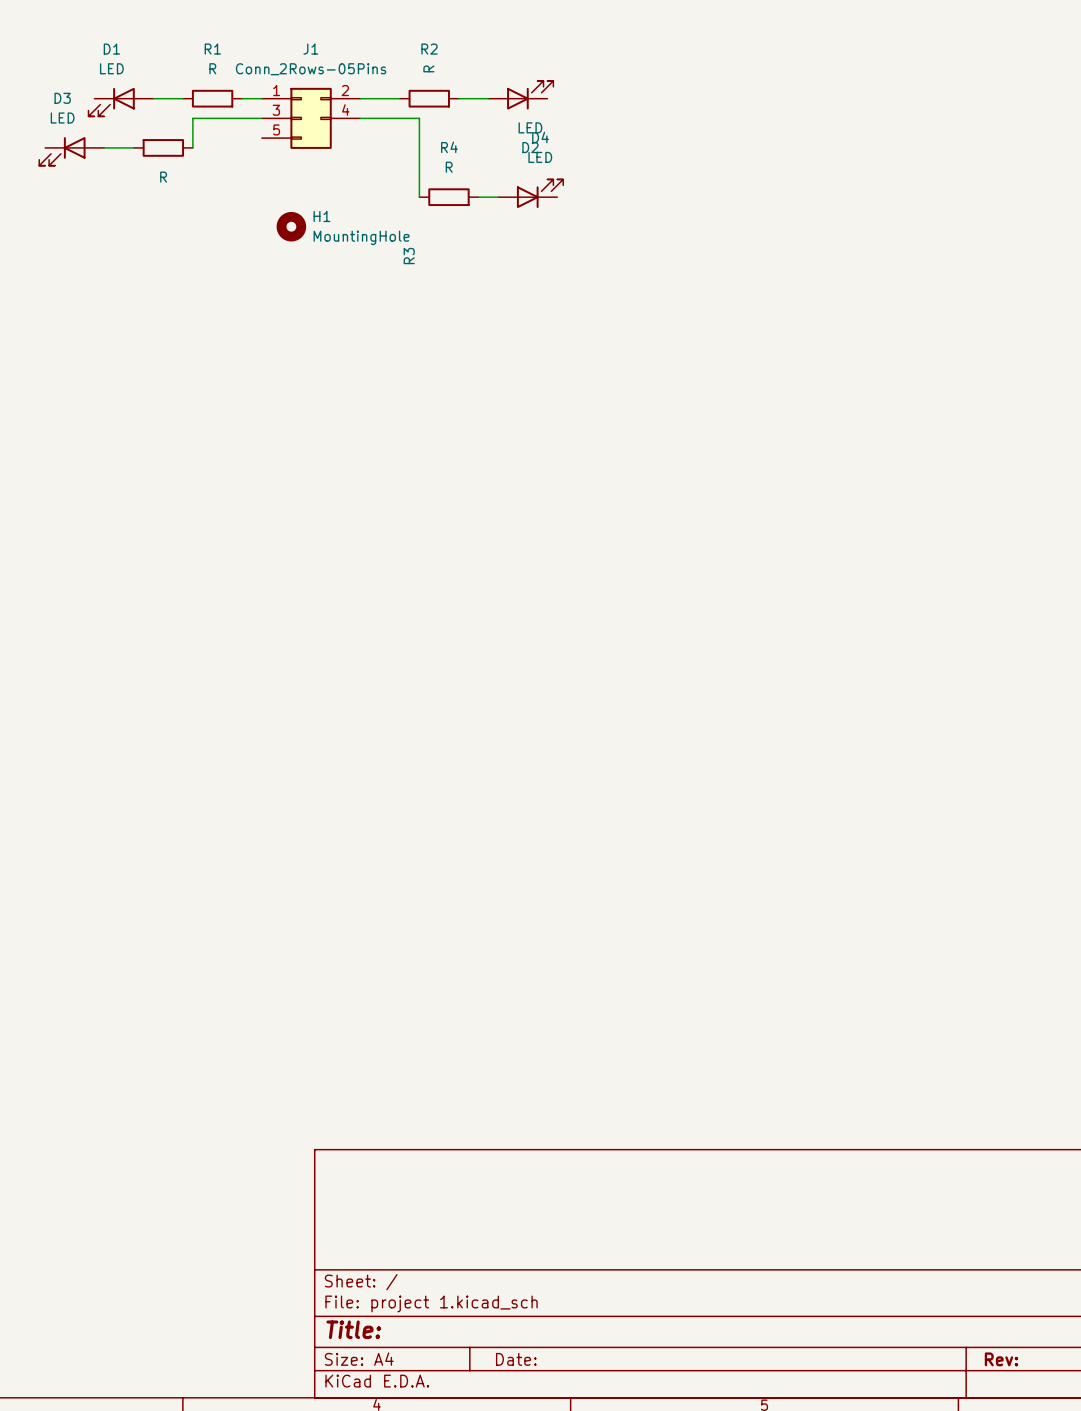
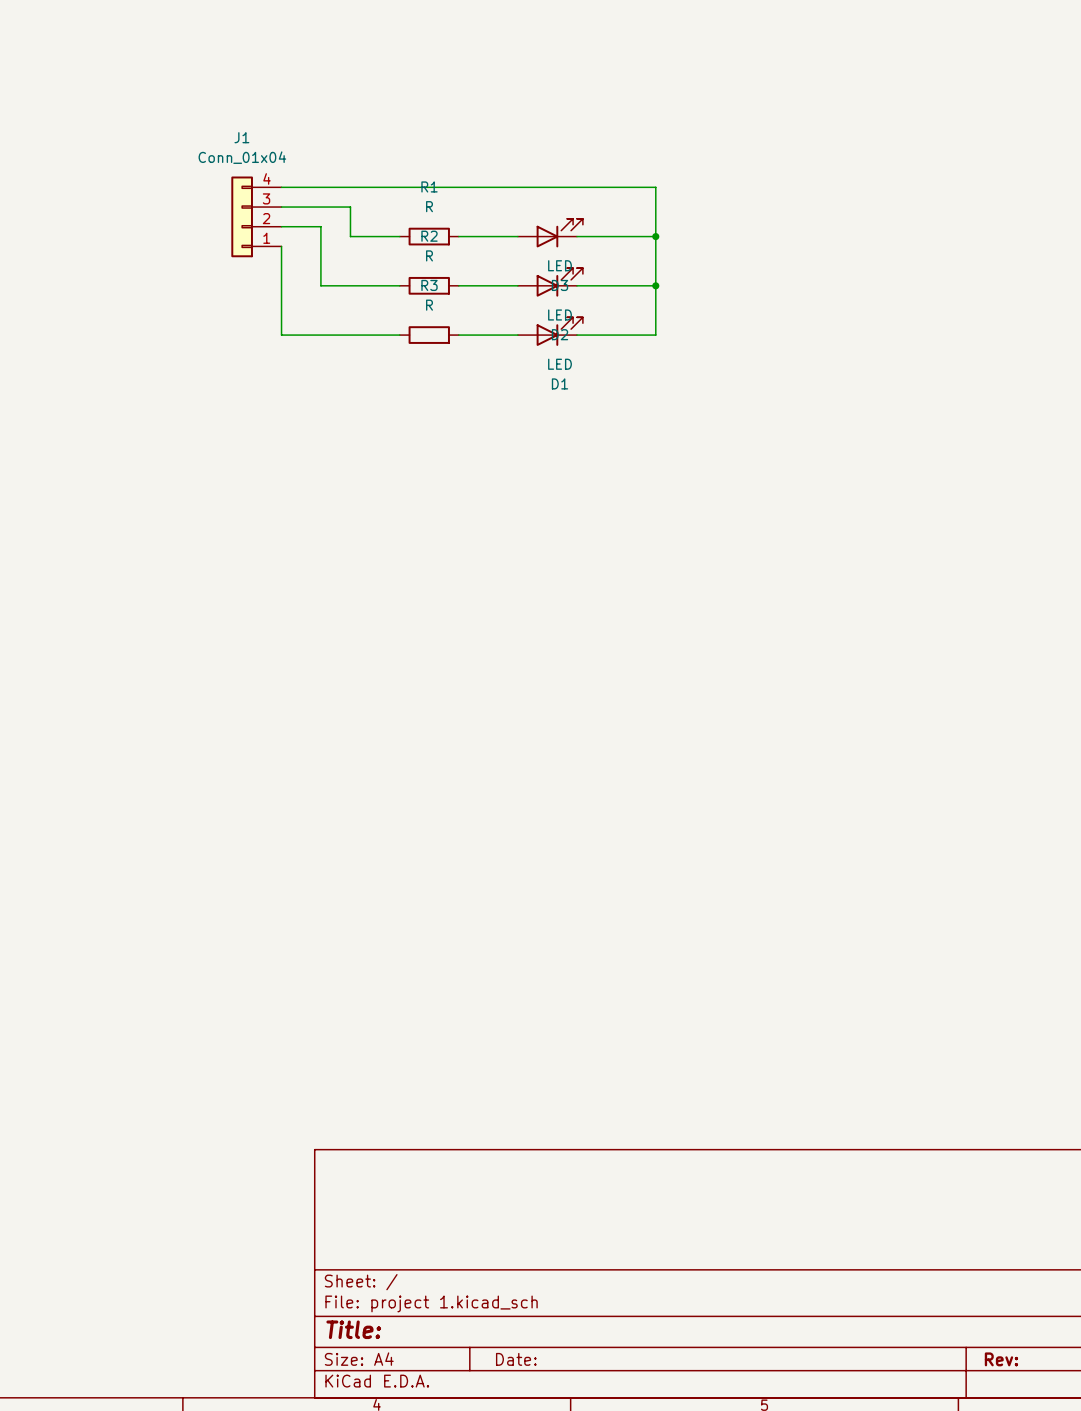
J1 name position: J1 (310, 49) -> J1 (241, 137)
R2 value rotation: 0° (428, 68) -> 90° clockwise (429, 255)
J1 value: Conn_2Rows-05Pins (311, 69) -> Conn_01x04 (242, 157)
J1 symbol: [261, 87, 361, 149] -> [231, 176, 282, 258]
D2 position: (520, 95) -> (550, 282)
wire: (153, 98) (183, 98) -> none
R1 position: (212, 98) -> (429, 236)
wire: (242, 98) (261, 98) -> none
wire: (360, 98) (399, 98) -> none
R2 position: (429, 98) -> (429, 285)
wire: (458, 98) (488, 98) -> none
D1 rotation: 0° (111, 102) -> 180° (559, 331)
D1 position: (120, 102) -> (550, 331)
wire: (261, 118) (192, 118) (192, 147) -> none
wire: (360, 118) (419, 118) (419, 197) -> none
wire: (104, 147) (133, 147) -> none
R3 position: (163, 147) -> (429, 335)
D3 rotation: 0° (62, 151) -> 180° (559, 233)
D3 position: (71, 151) -> (550, 233)
R3 value position: R (163, 177) -> R (429, 305)
wire: none -> (281, 187) (655, 187) (655, 335) (577, 335)
D4: LED (530, 193) -> none
R4: R (448, 197) -> none
wire: (478, 197) (498, 197) -> none
wire: none -> (281, 207) (350, 207) (350, 236) (399, 236)
wire: none -> (281, 226) (320, 226) (320, 285) (399, 285)
H1: MountingHole (291, 226) -> none
wire: none -> (458, 236) (517, 236)
wire: none -> (577, 236) (655, 236)
junction: none -> (655, 236)
wire: none -> (281, 246) (281, 335) (399, 335)
R3 name rotation: 0° (409, 256) -> 90° clockwise (429, 285)
R3 name position: R3 (409, 256) -> R3 (429, 285)
wire: none -> (458, 285) (517, 285)
wire: none -> (577, 285) (655, 285)
junction: none -> (655, 285)
wire: none -> (458, 335) (517, 335)

